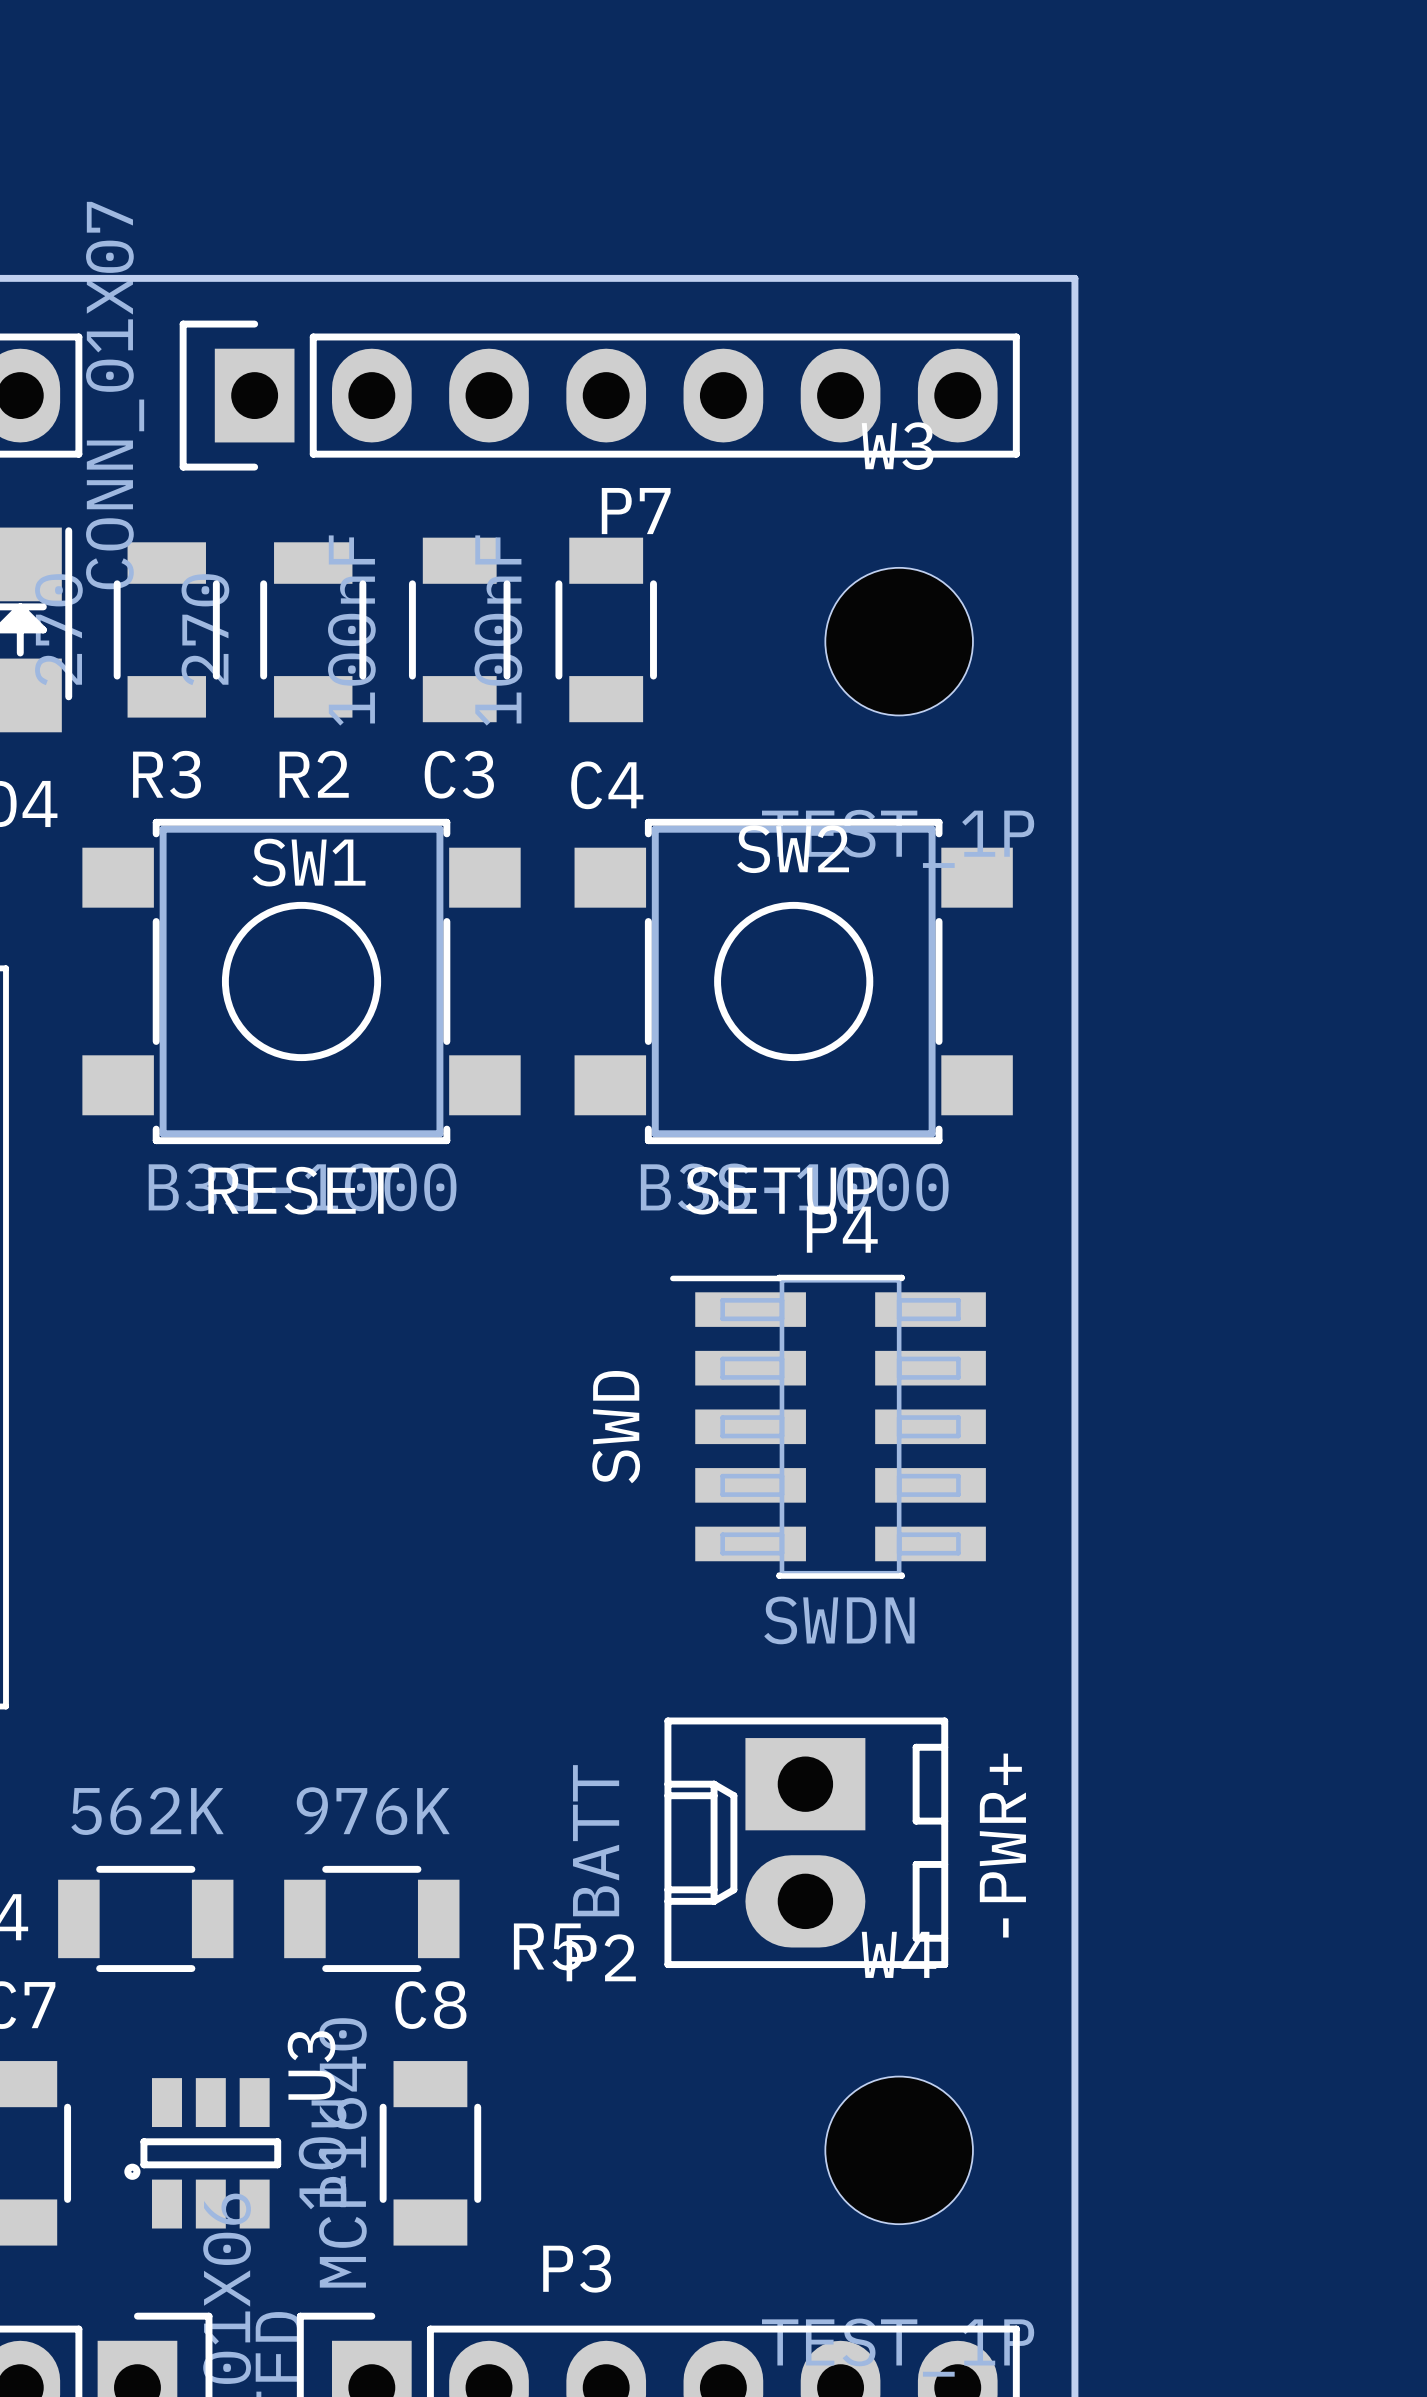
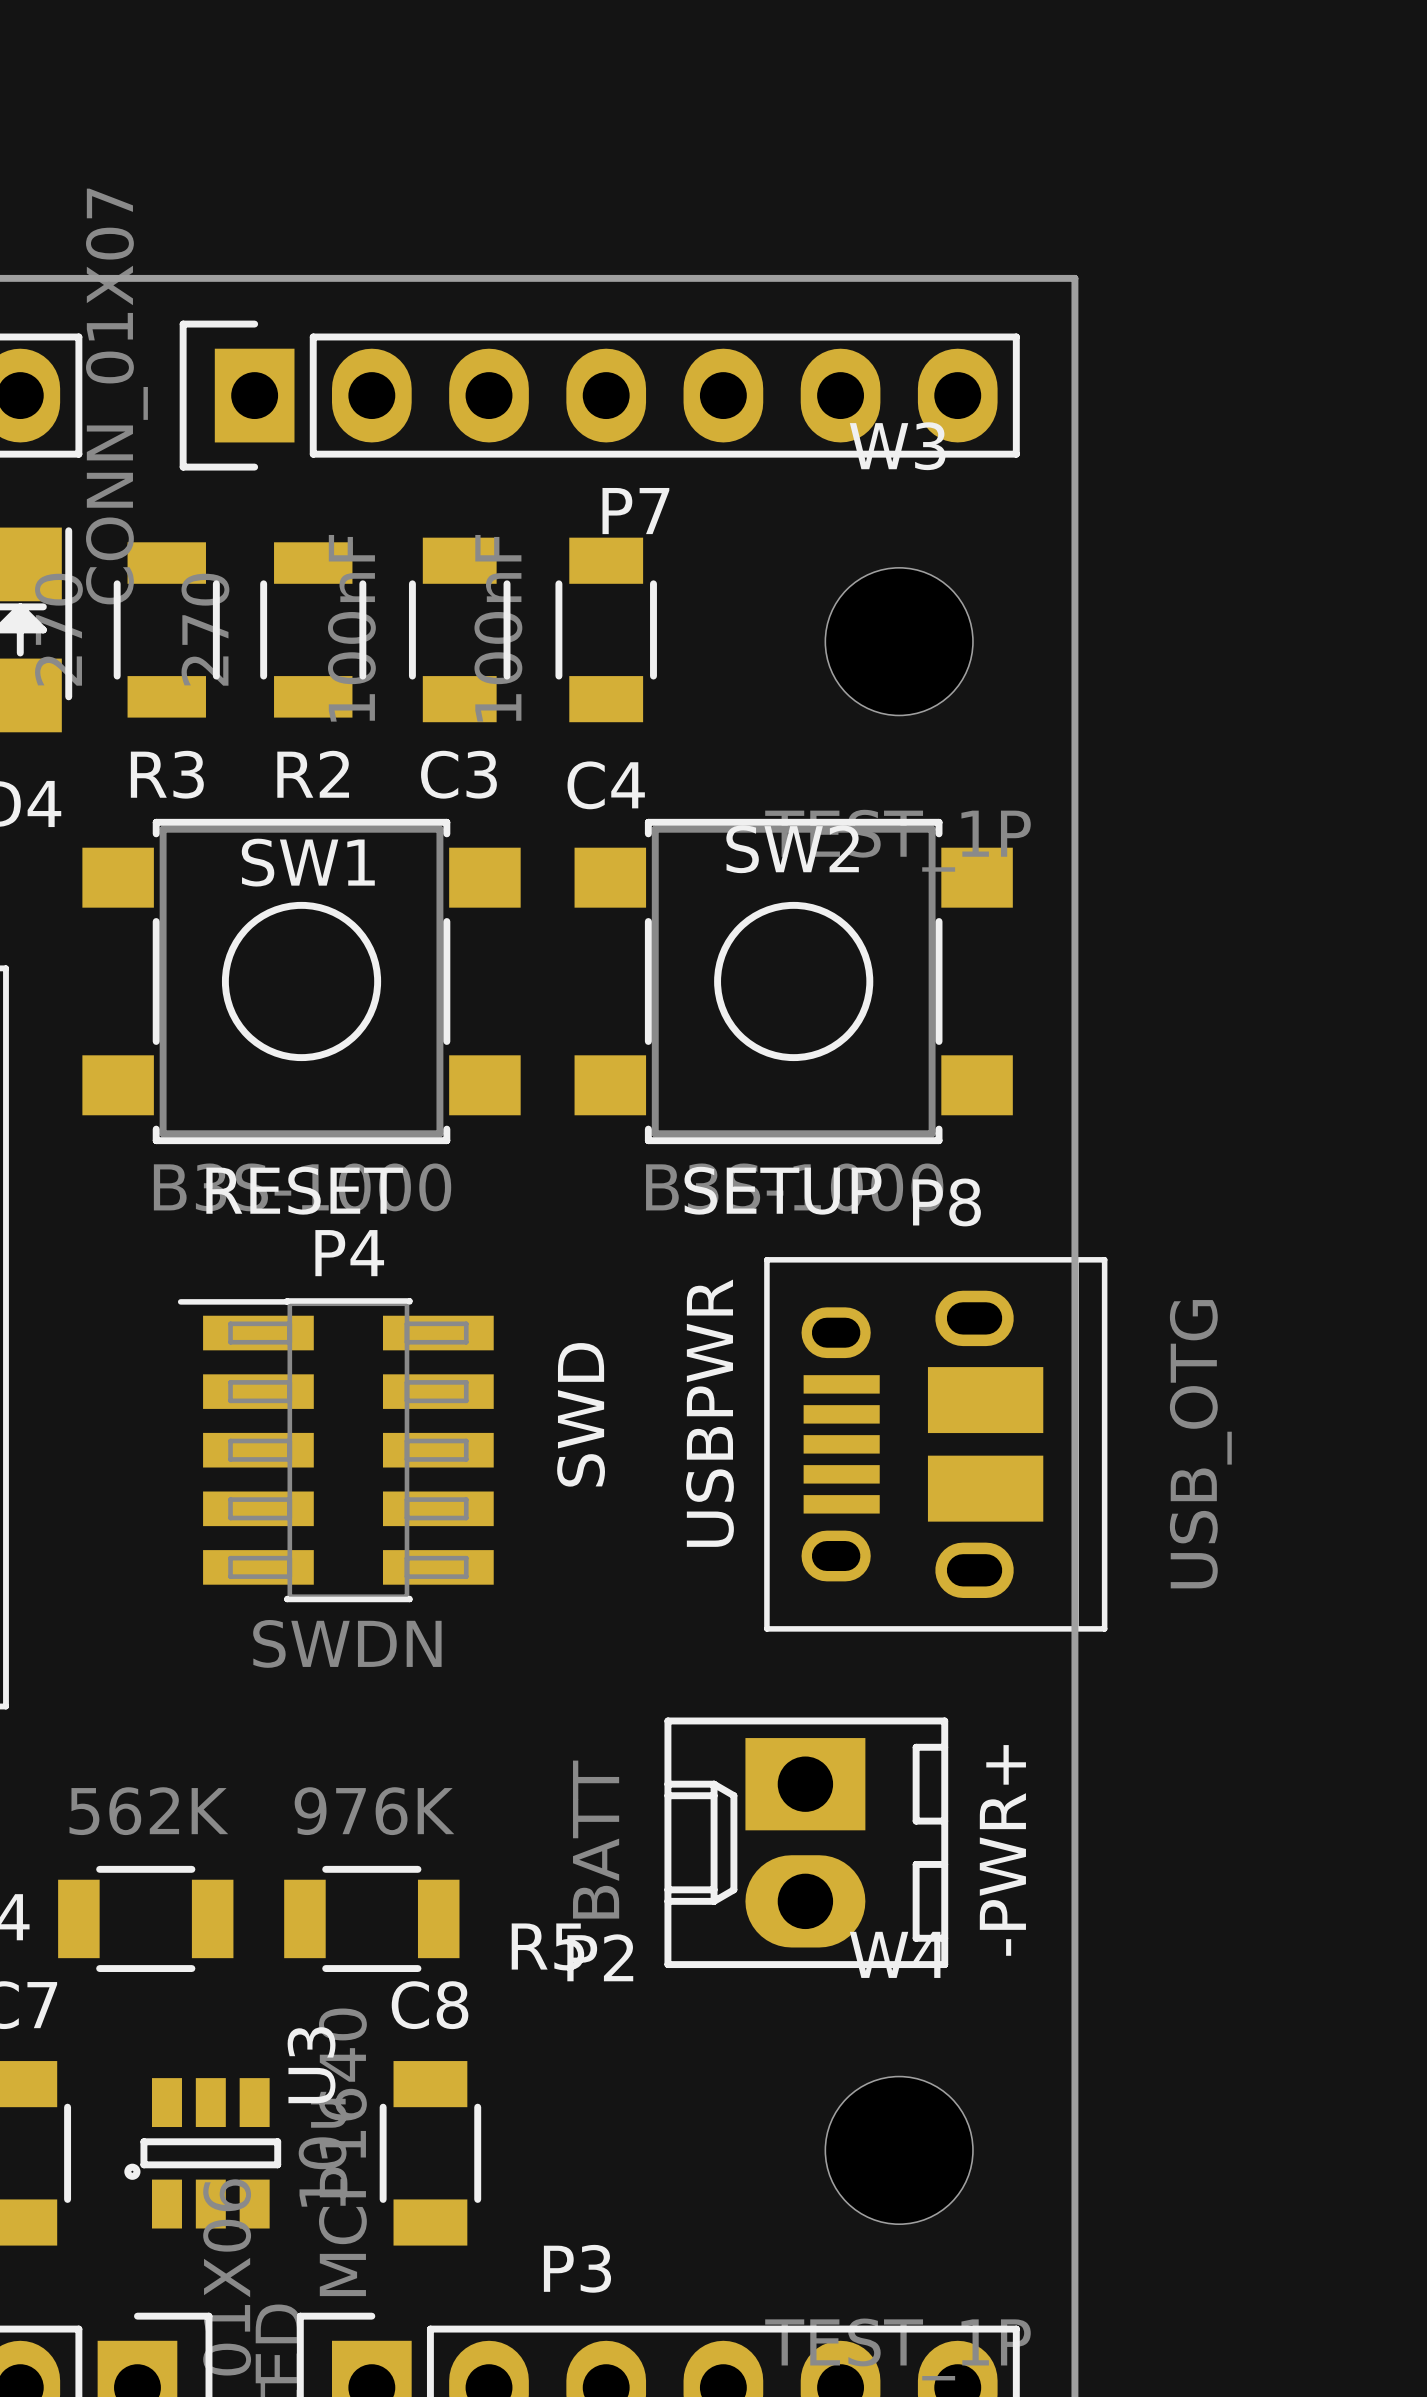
text: none -> USBPWR (709, 1413)
P4 position: (827, 1426) -> (335, 1450)
text position: SWD (616, 1427) -> SWD (581, 1414)
P8: none -> USB_OTG (935, 1444)

